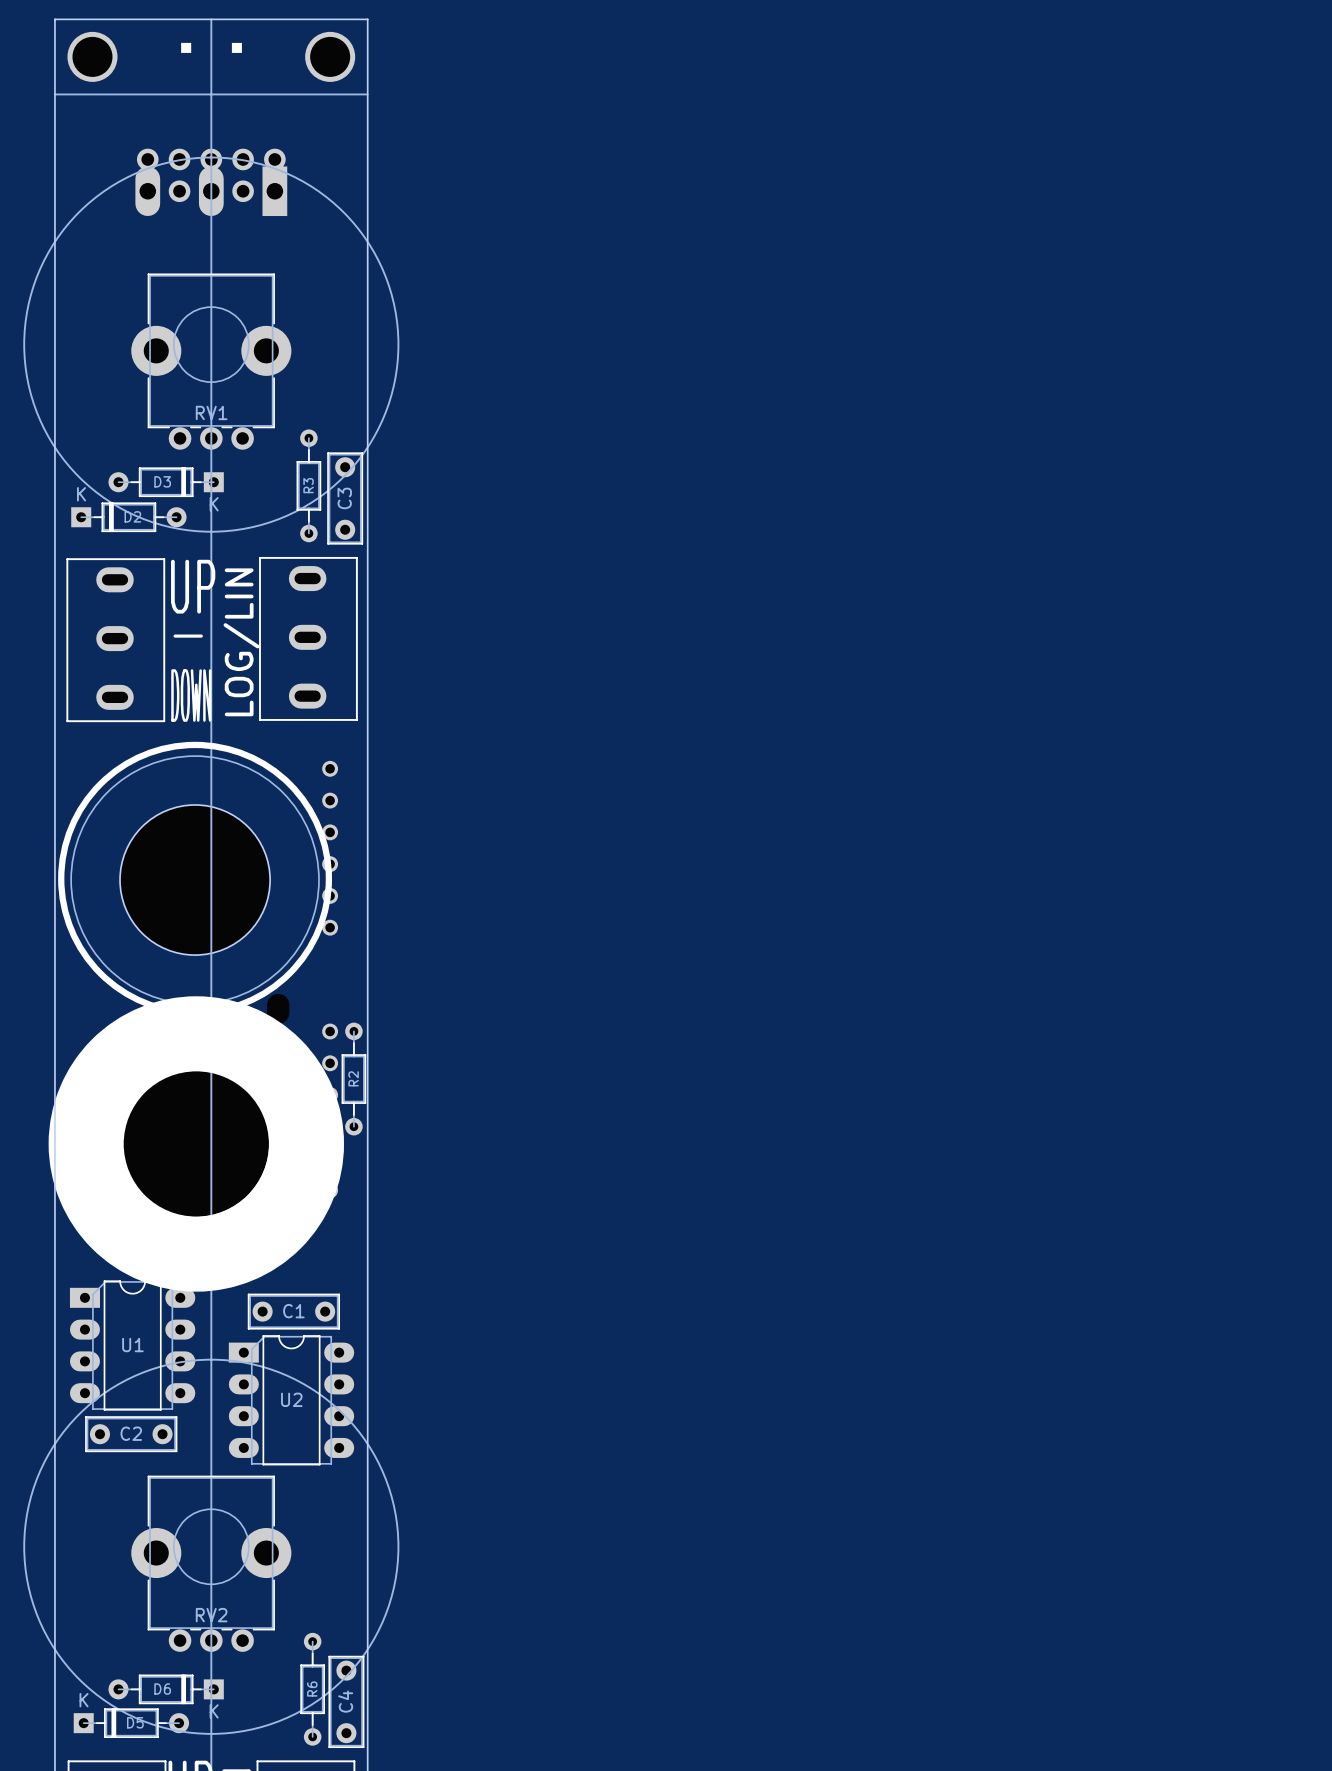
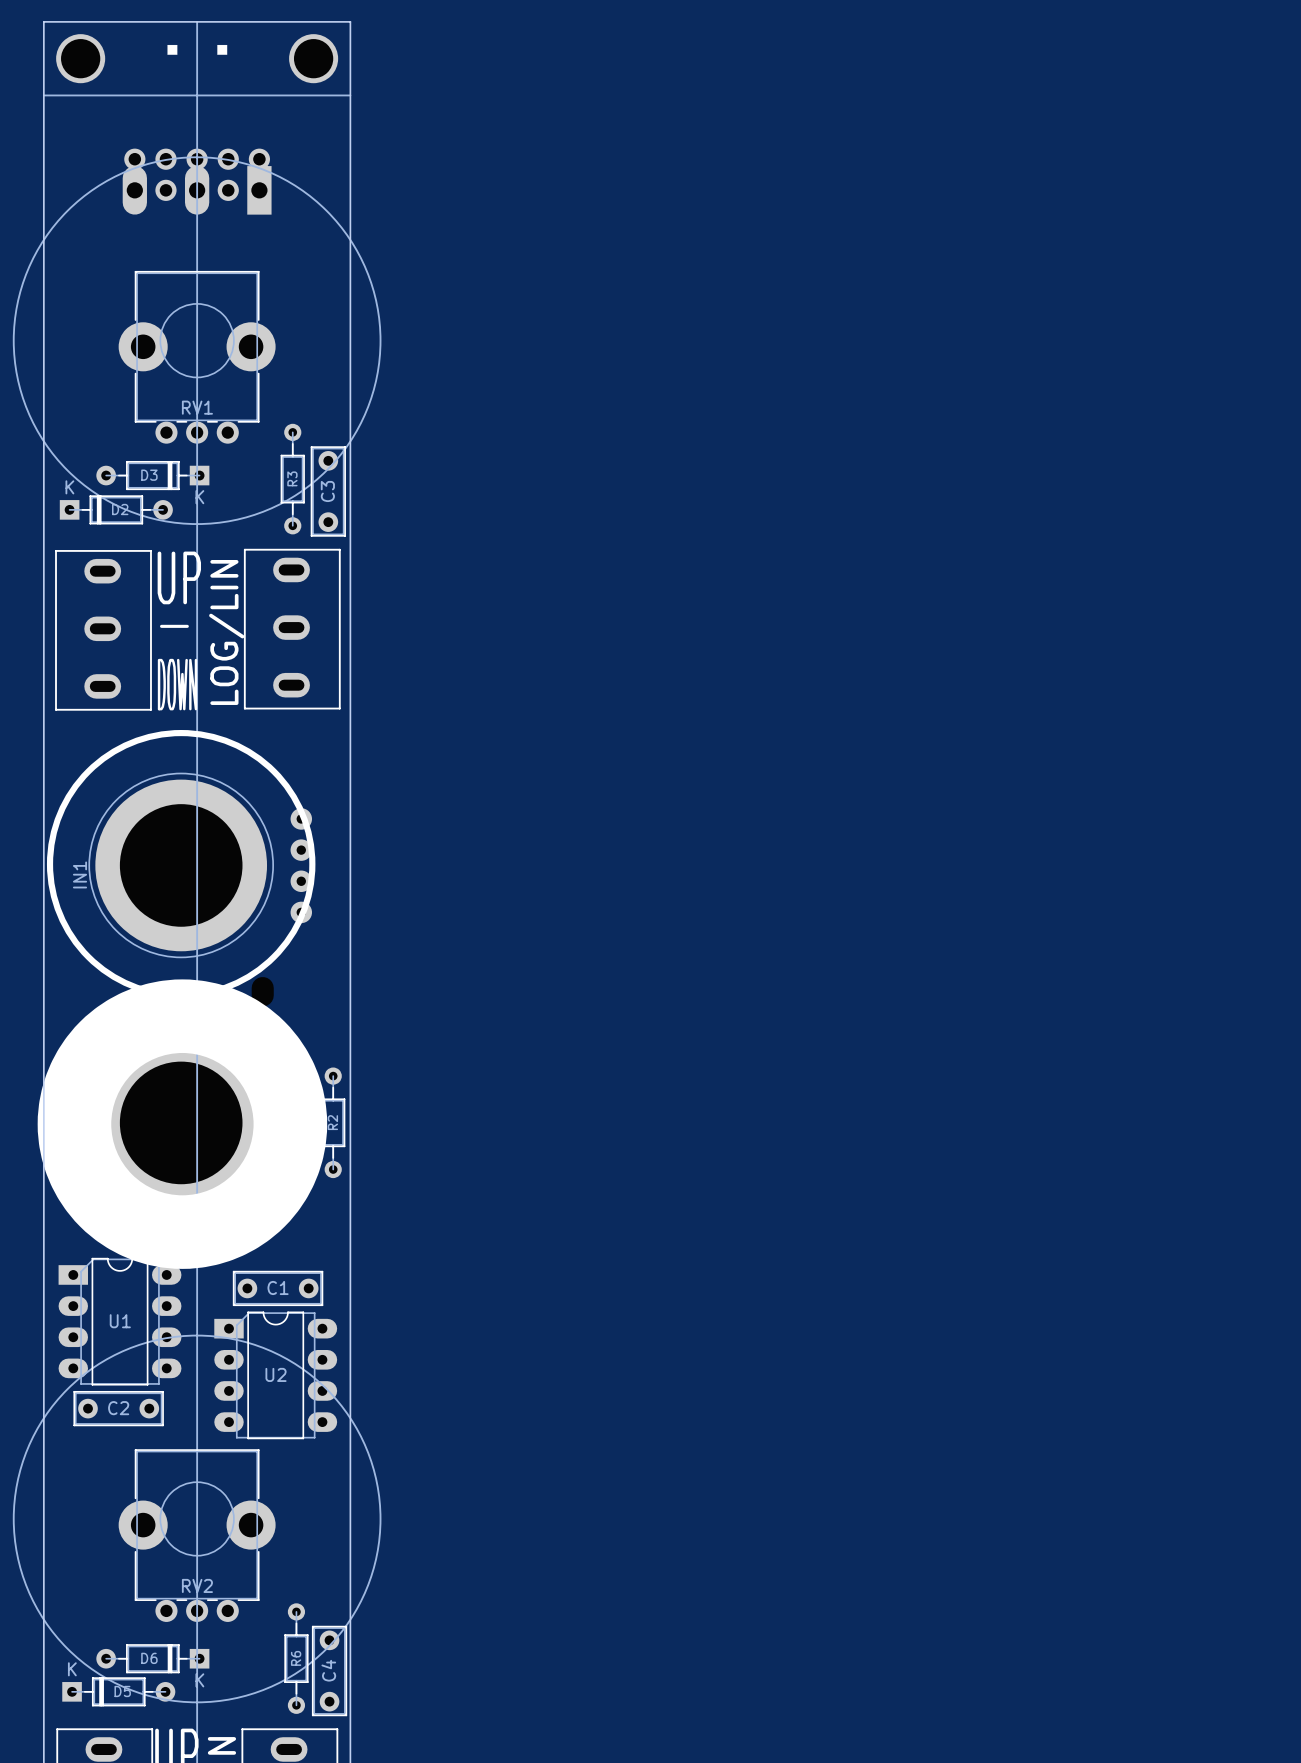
part footprint: [70, 755, 339, 1005] -> [88, 772, 313, 959]
part value: none -> IN1 (80, 874)
part footprint: [70, 1018, 339, 1268] -> [88, 1030, 313, 1216]
R2 position: (353, 1079) -> (333, 1122)

